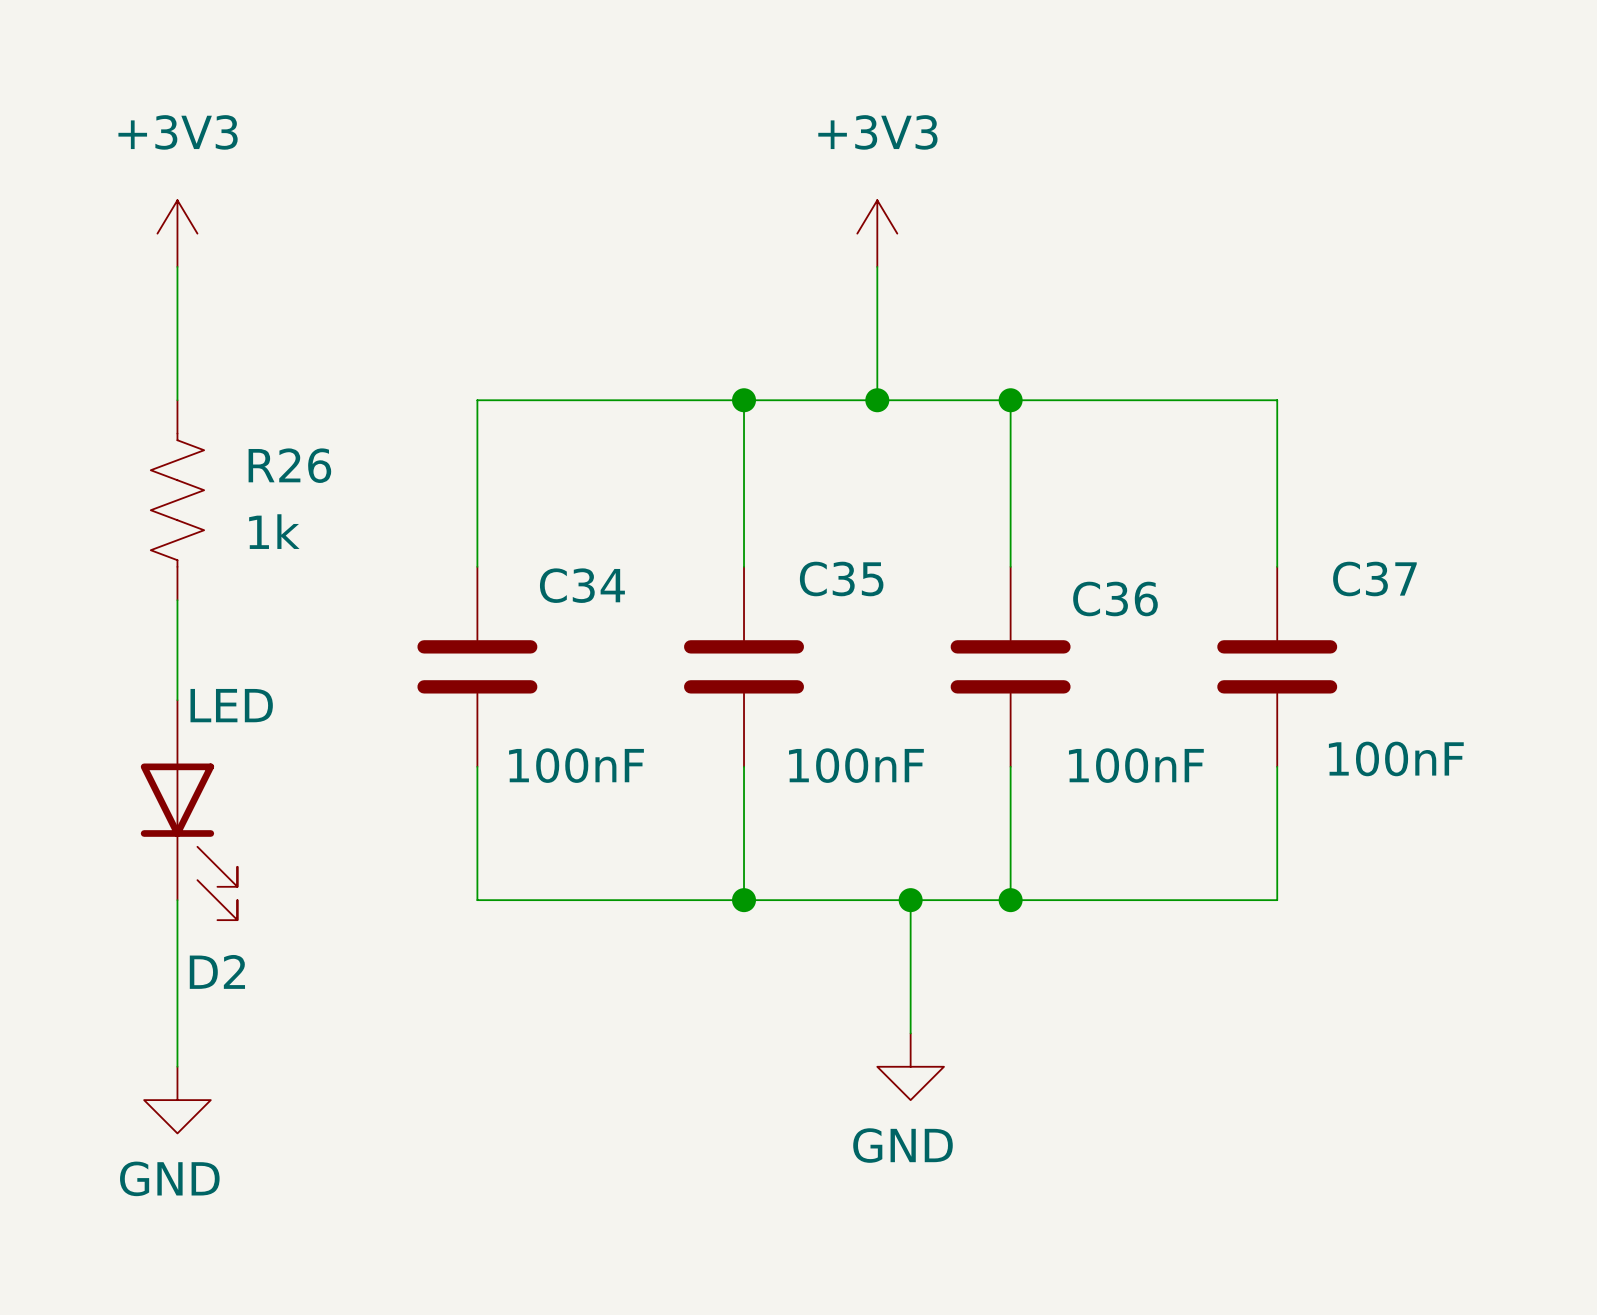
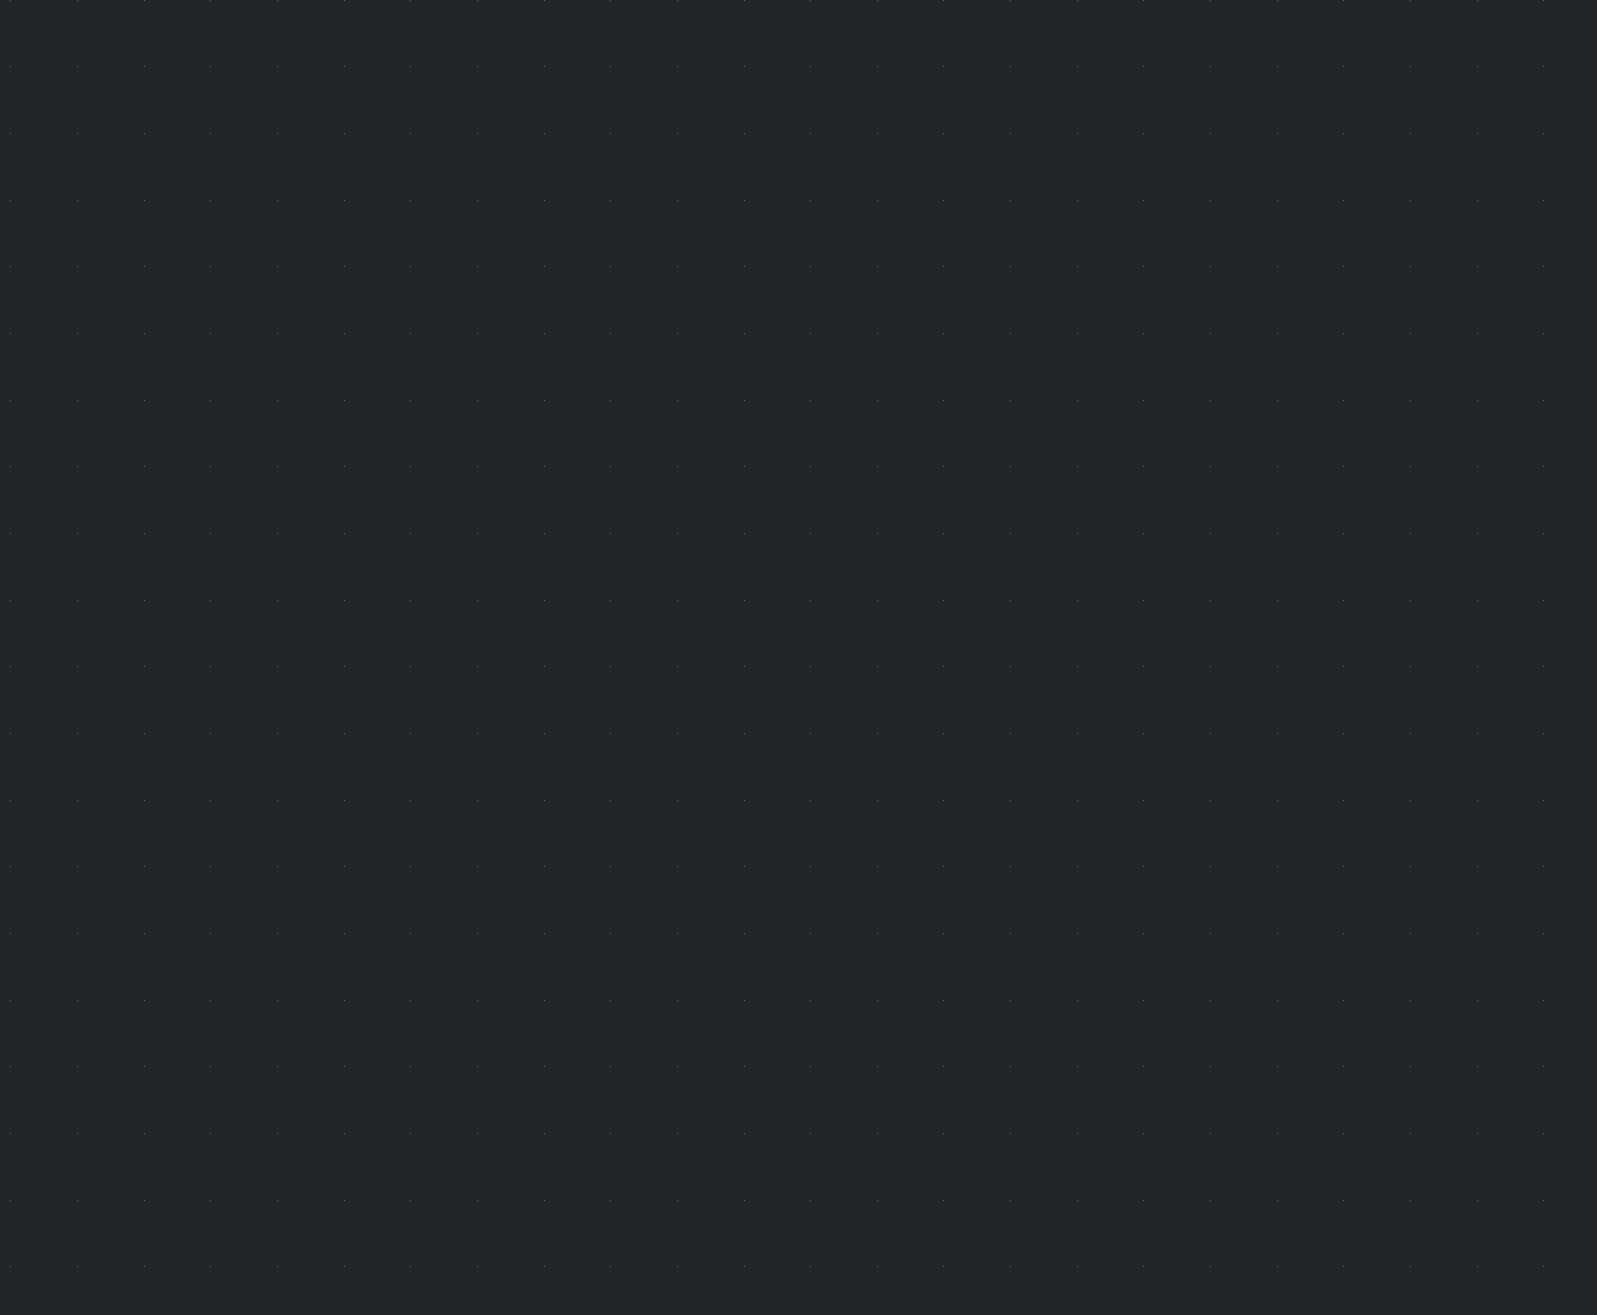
power symbol: +3V3 (177, 233) -> none
power symbol: +3V3 (877, 233) -> none
wire: (177, 266) (177, 400) -> none
wire: (877, 266) (877, 400) -> none
wire: (744, 400) (744, 566) -> none
junction: (744, 400) -> none
junction: (877, 400) -> none
wire: (1010, 400) (1010, 566) -> none
junction: (1010, 400) -> none
R26: 1k (177, 500) -> none
wire: (477, 566) (477, 400) (1277, 400) (1277, 566) -> none
wire: (177, 600) (177, 700) -> none
C34: 100nF (477, 666) -> none
C35: 100nF (744, 666) -> none
C36: 100nF (1010, 666) -> none
C37: 100nF (1277, 666) -> none
wire: (477, 766) (477, 900) (1277, 900) (1277, 766) -> none
wire: (744, 766) (744, 900) -> none
wire: (1010, 766) (1010, 900) -> none
D2: LED (189, 810) -> none
wire: (177, 900) (177, 1066) -> none
junction: (744, 900) -> none
wire: (910, 900) (910, 1033) -> none
junction: (910, 900) -> none
junction: (1010, 900) -> none
power symbol: GND (910, 1066) -> none
power symbol: GND (177, 1100) -> none

